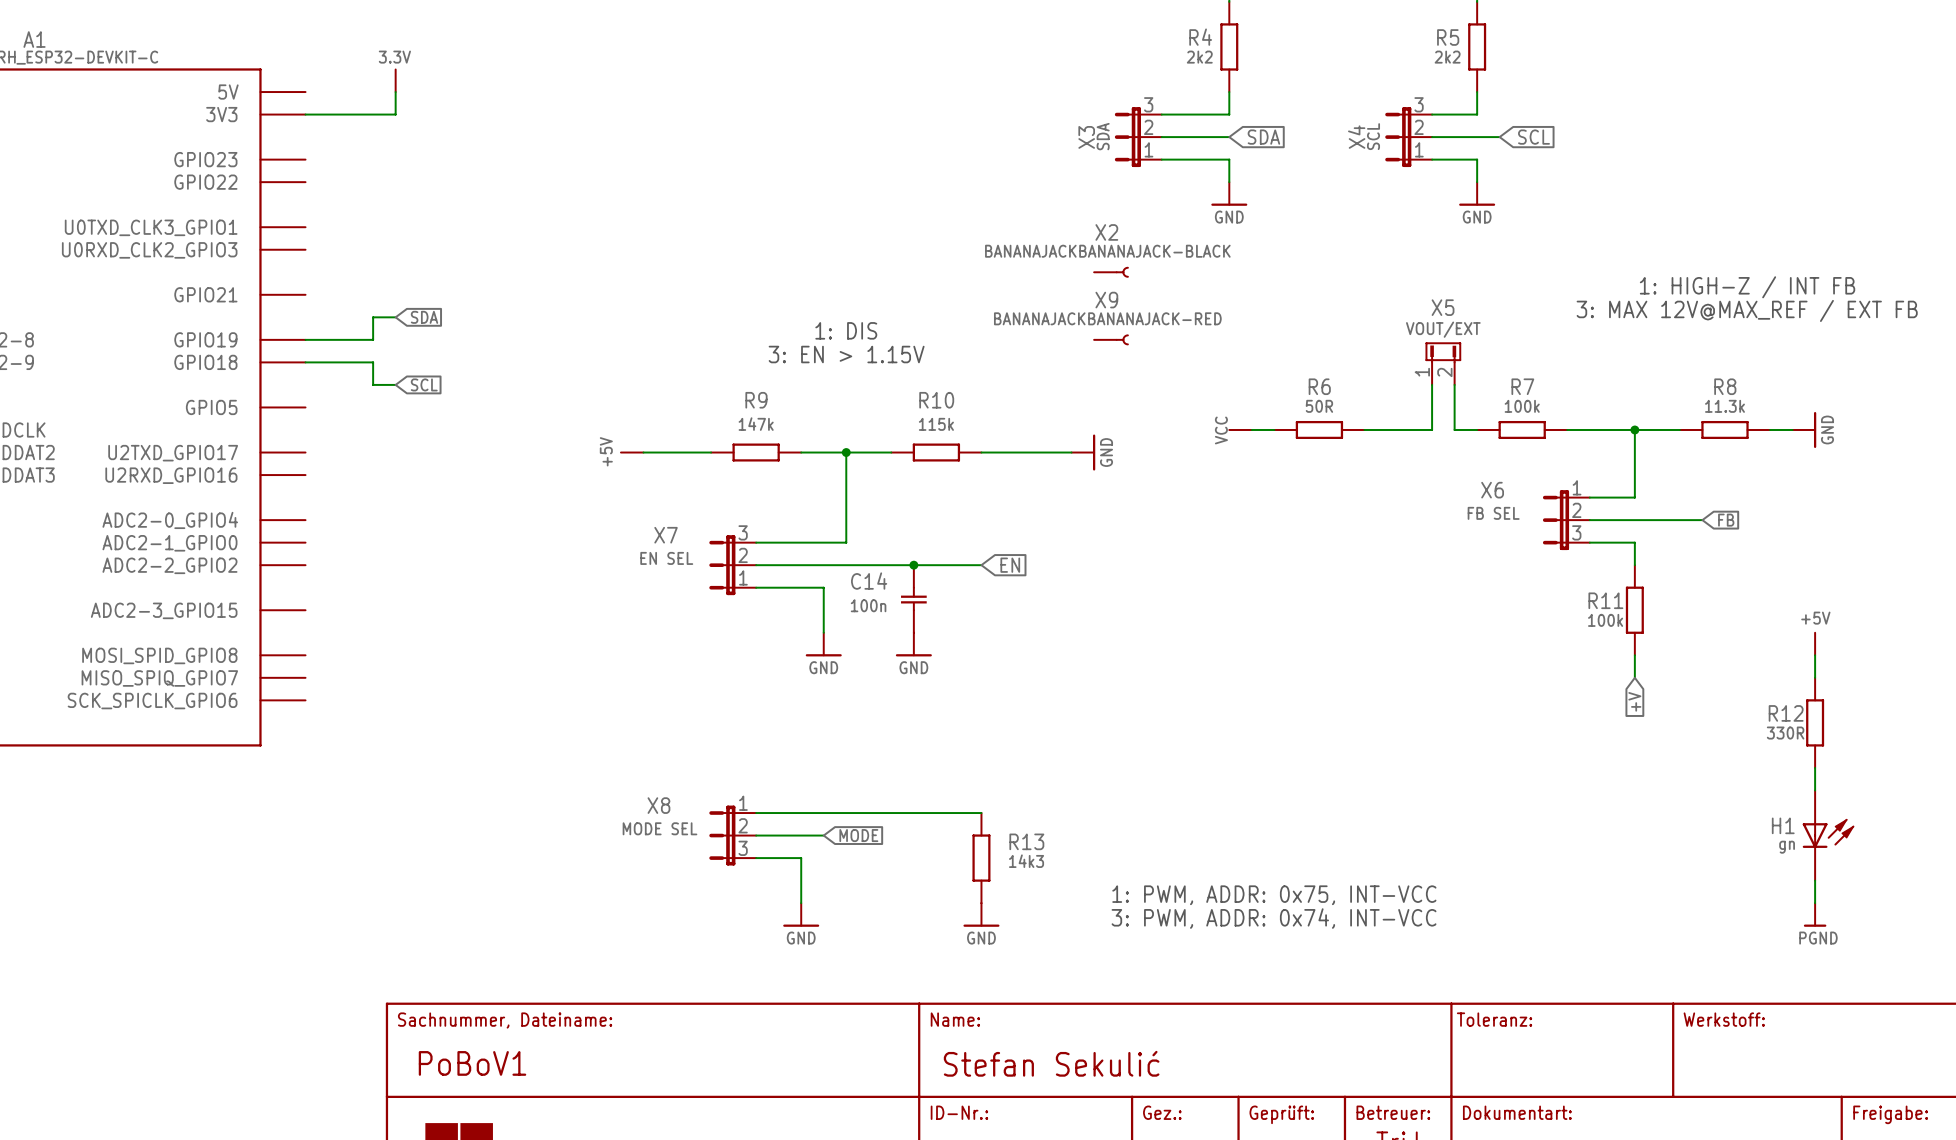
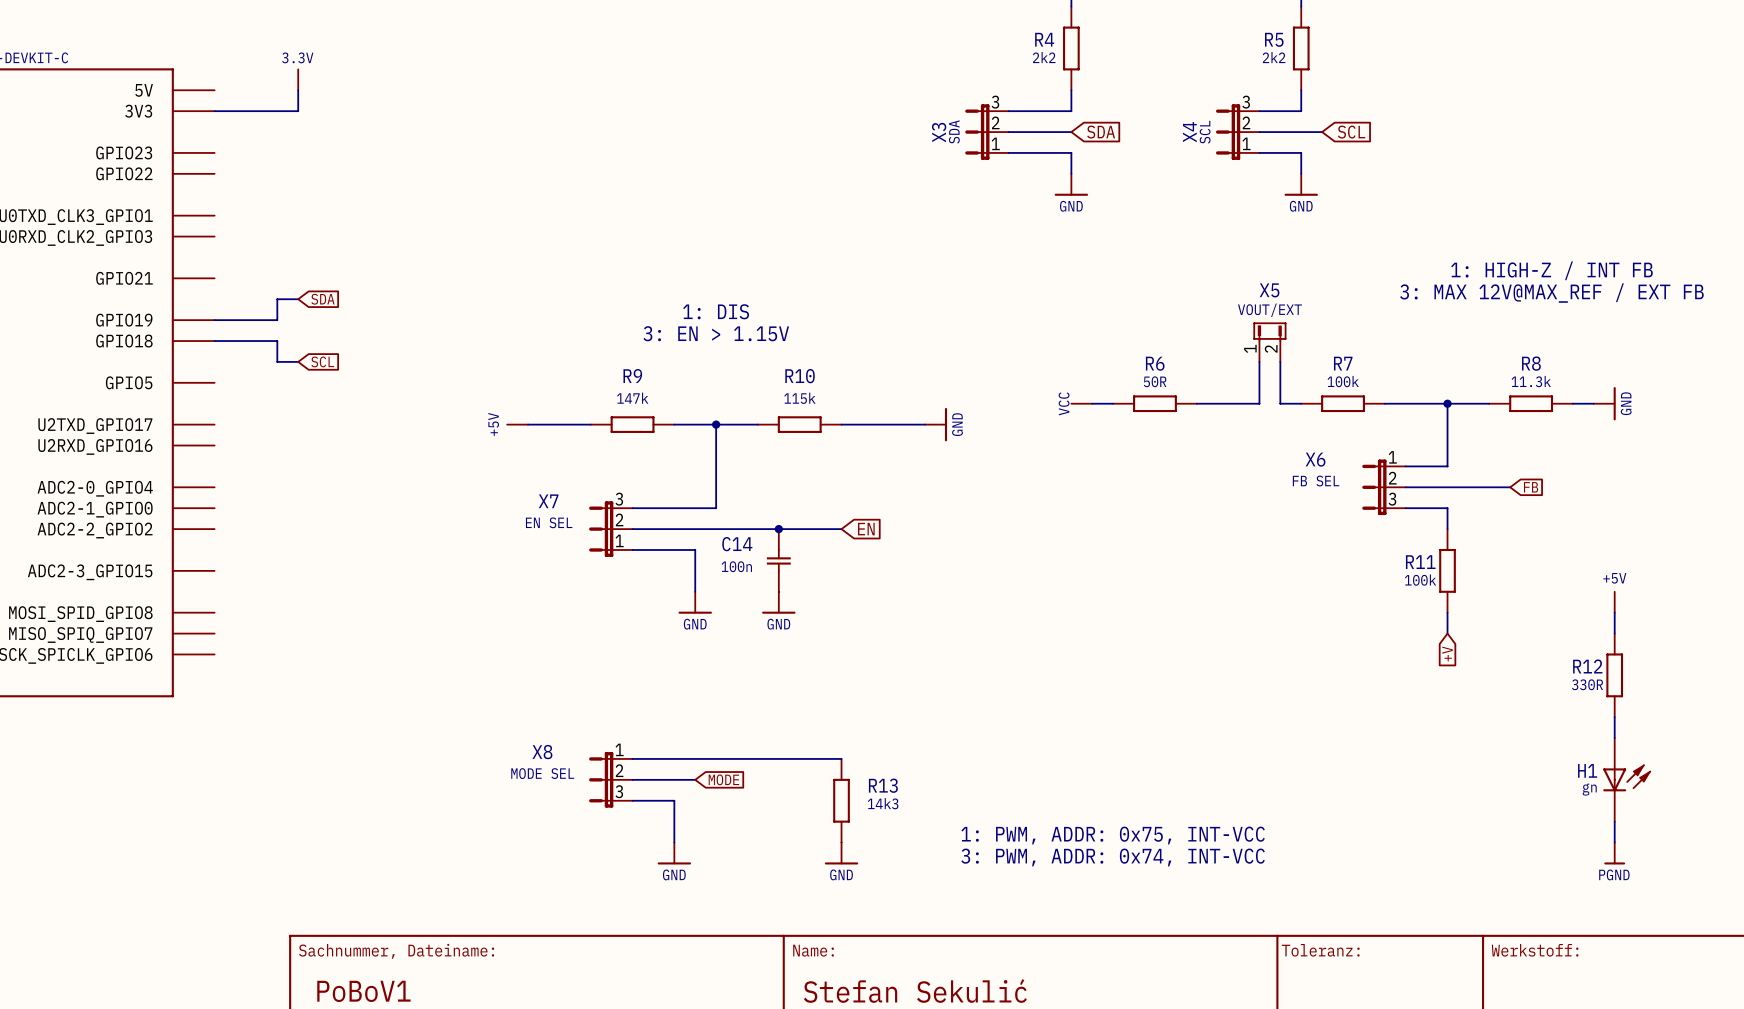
X2: BANANAJACKBANANAJACK-BLACK (1111, 272) -> none
X9: BANANAJACKBANANAJACK-RED (1111, 339) -> none

